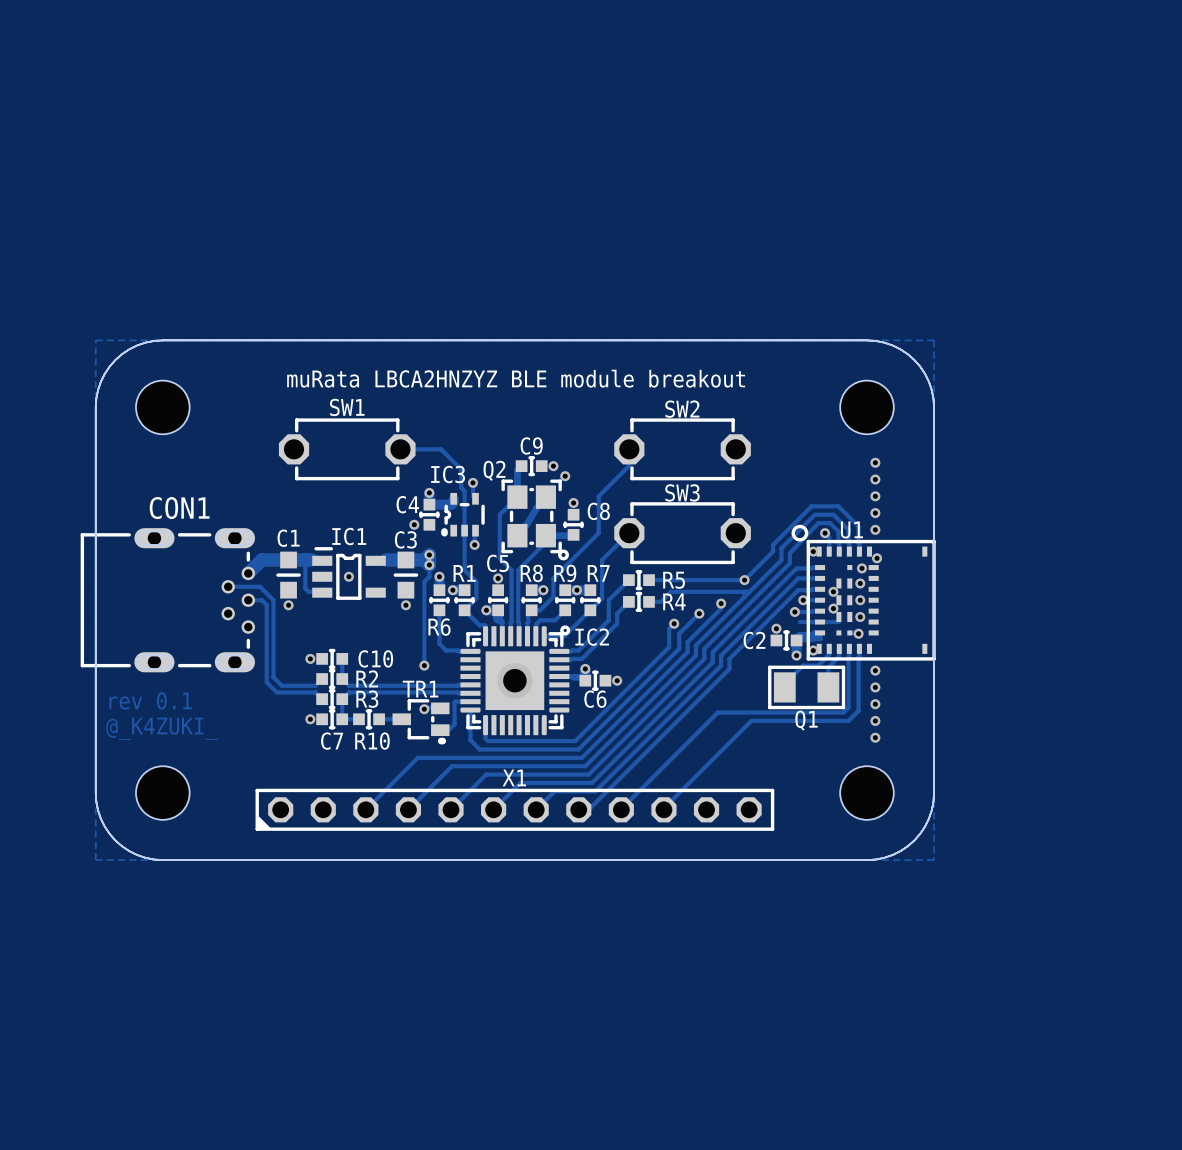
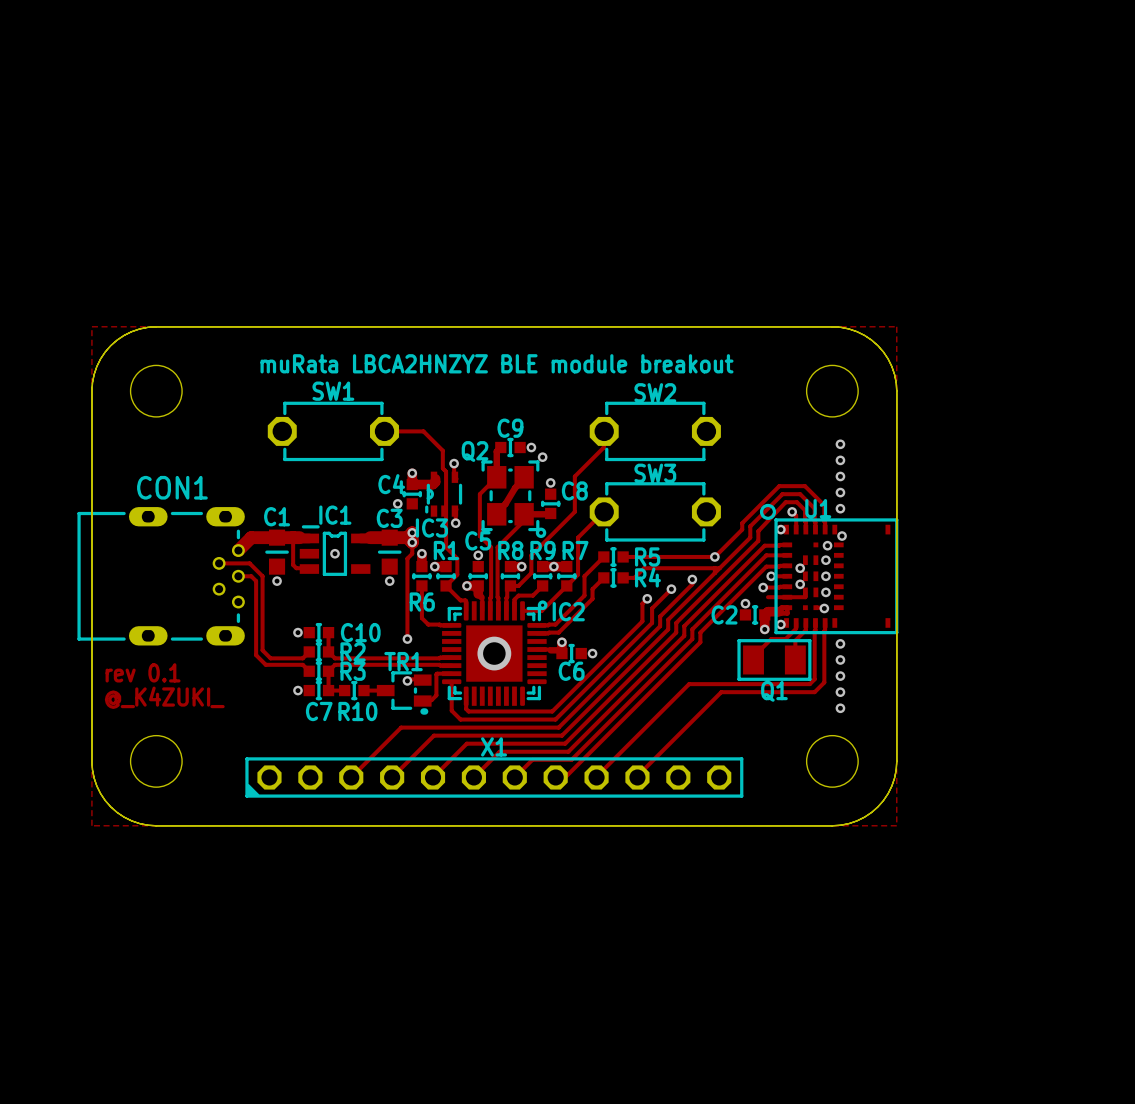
IC3 name position: IC3 (448, 474) -> IC3 (431, 527)
IC3 footprint: [441, 492, 485, 537] -> [425, 471, 463, 517]

